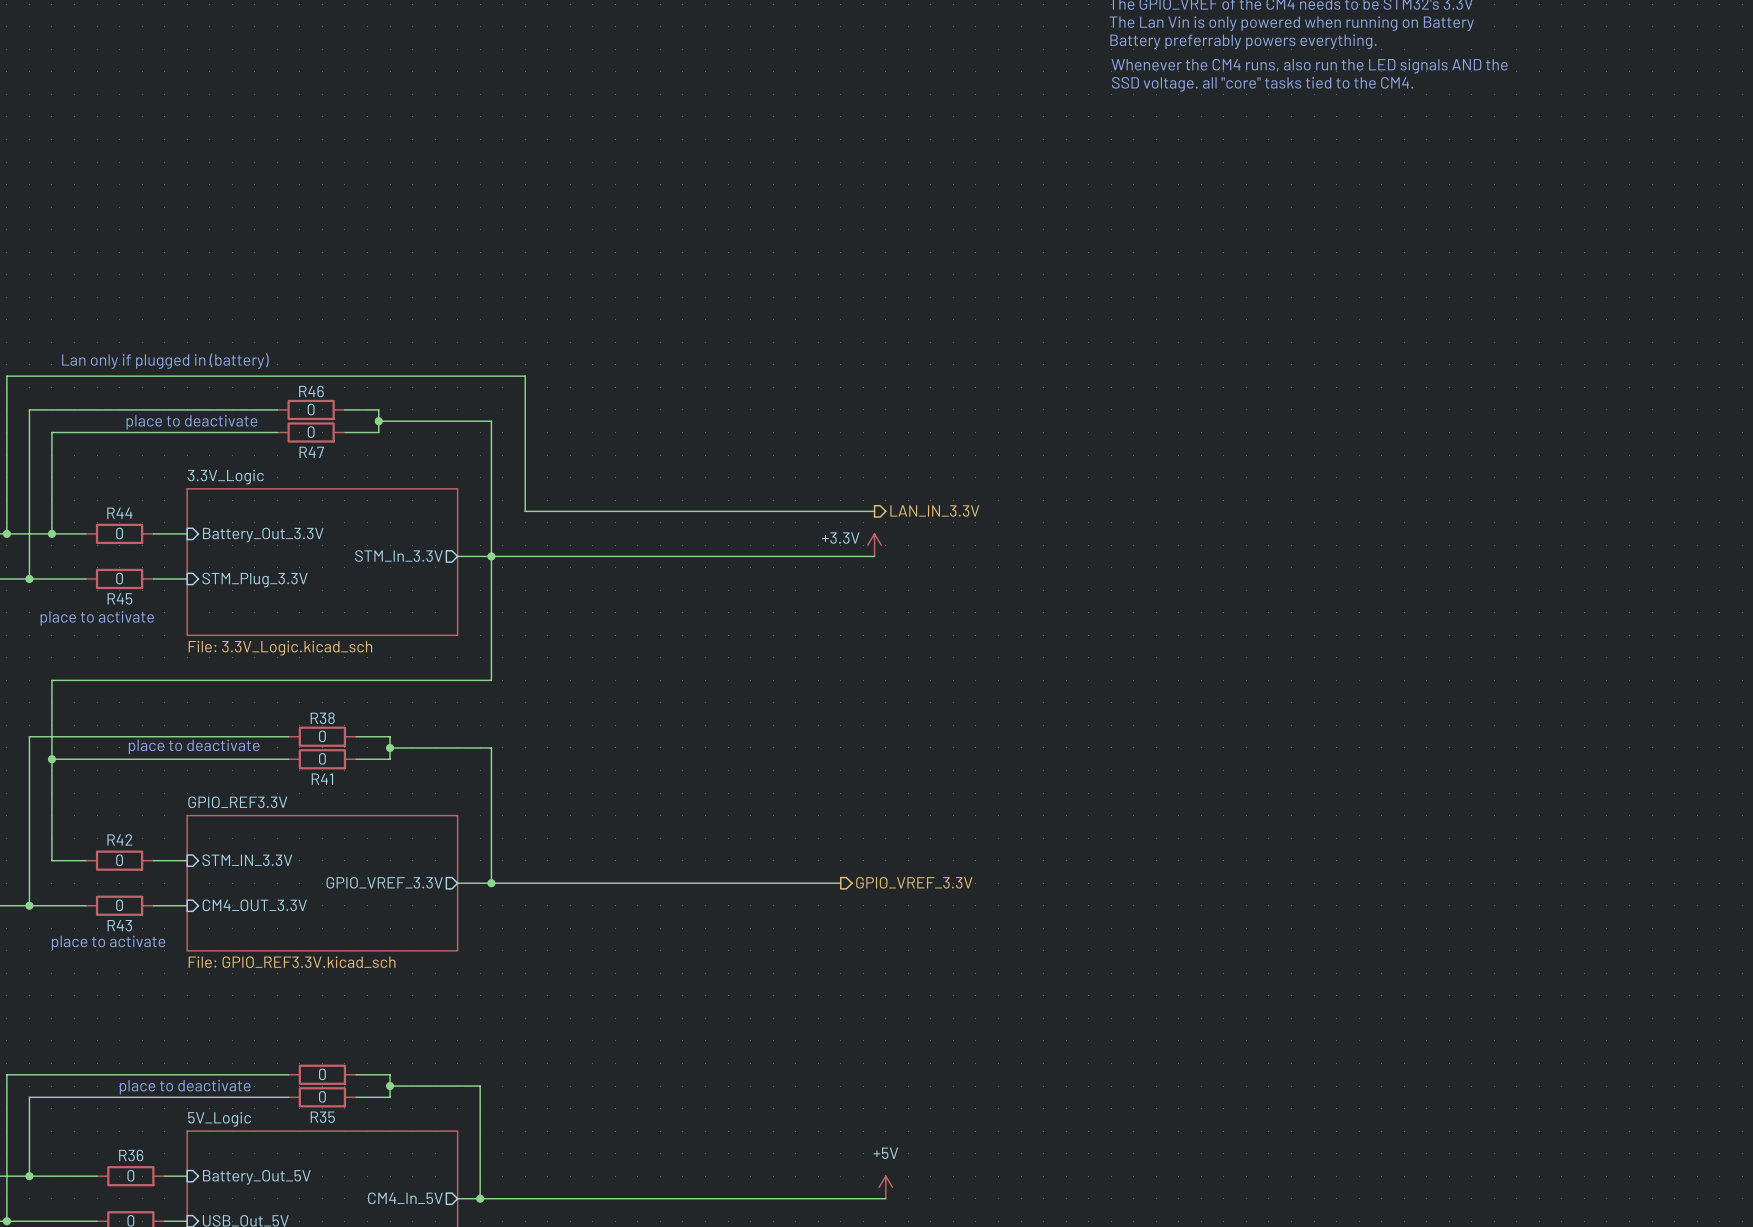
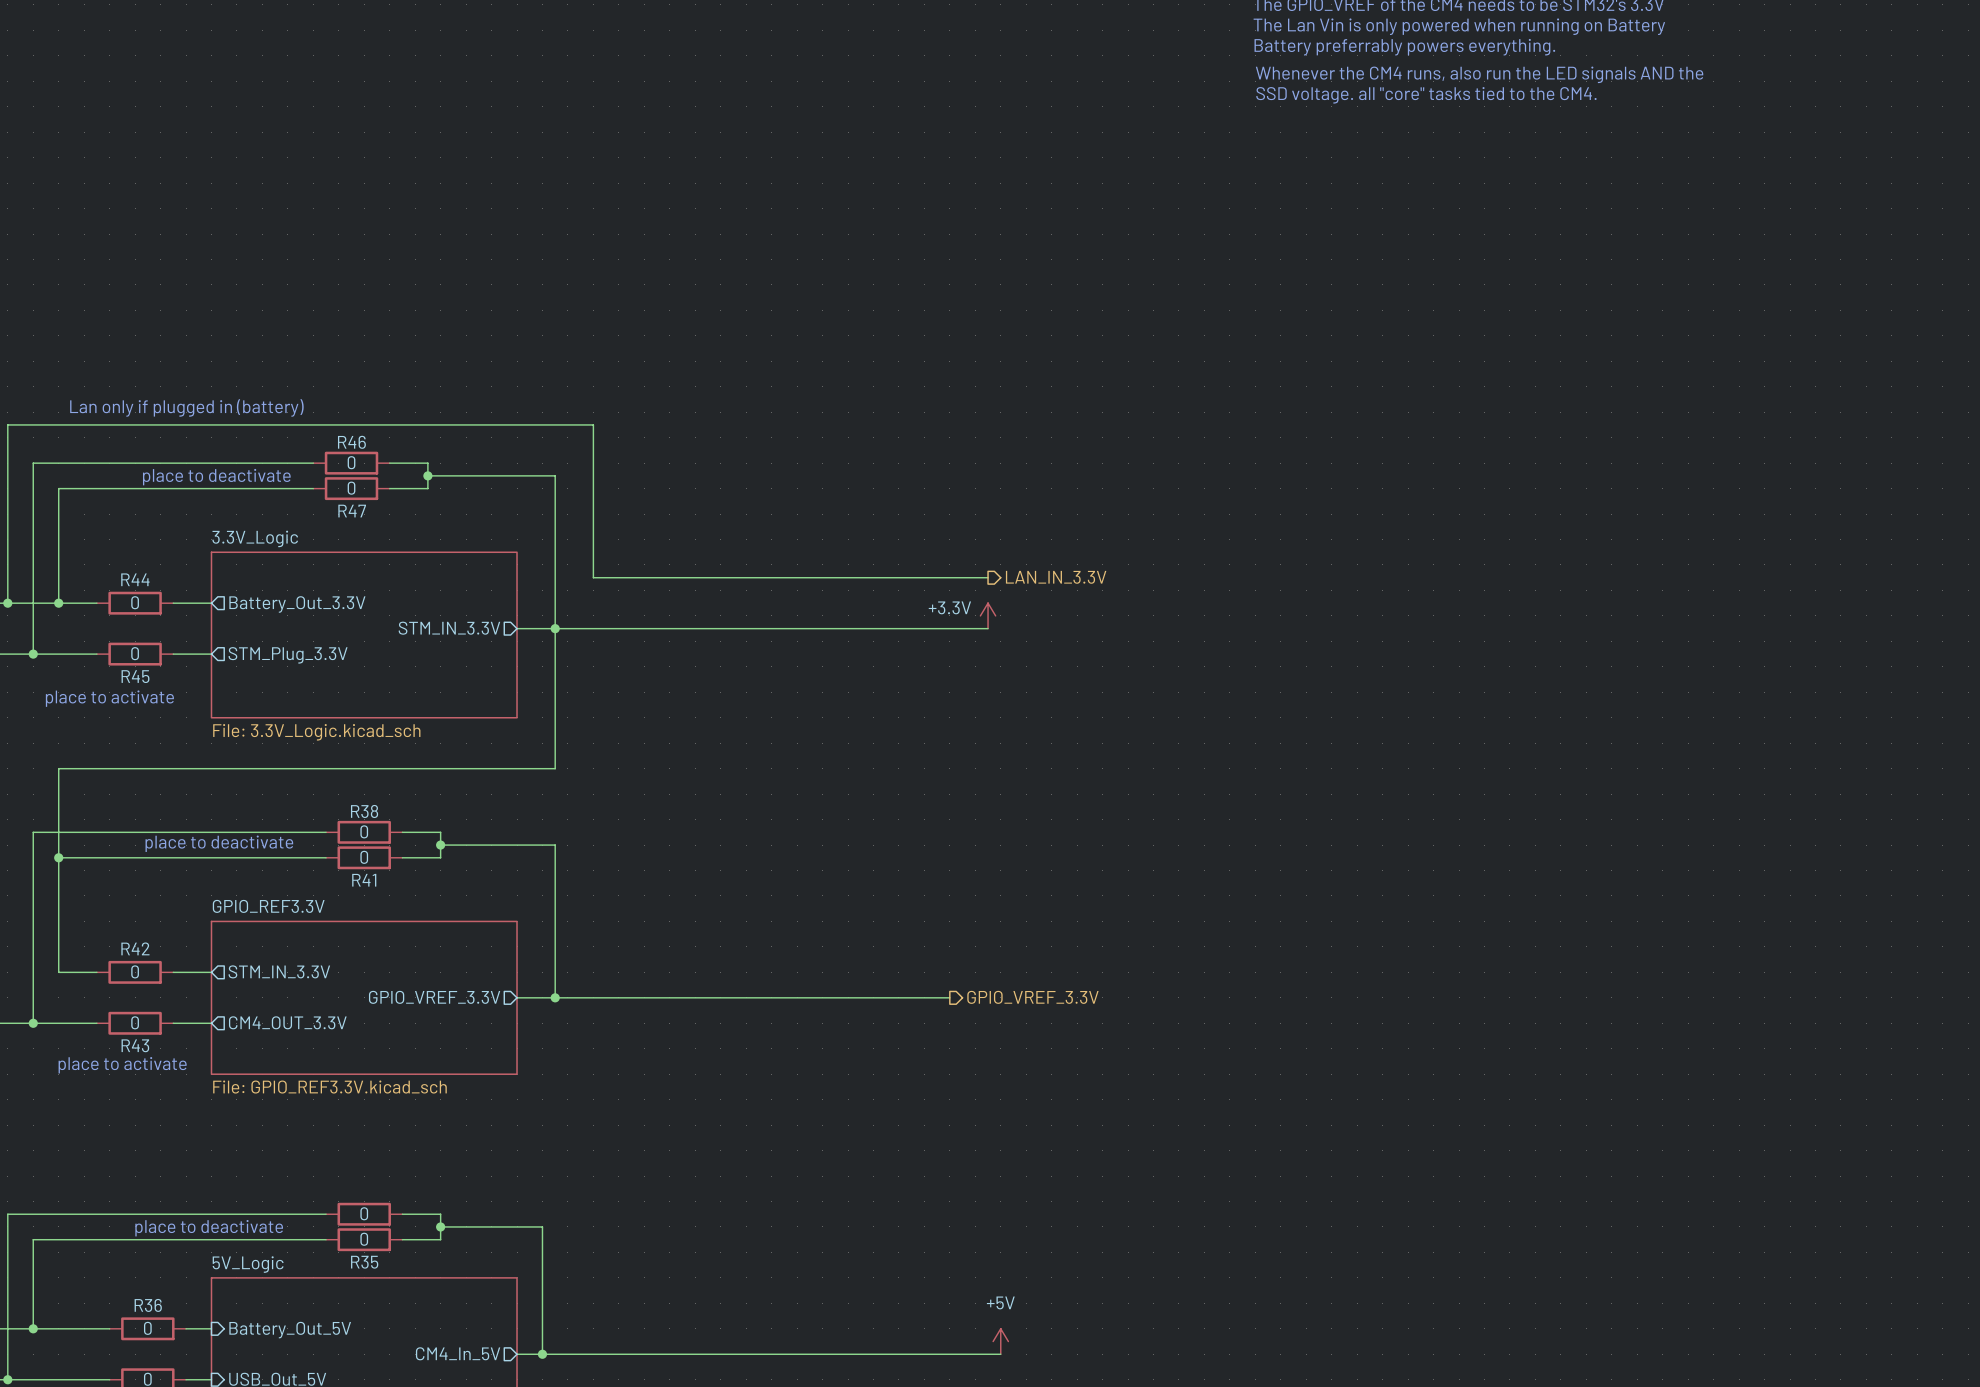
sheet pin shape: input (263, 535) -> output (297, 604)
sheet pin: STM_In_3.3V (398, 556) -> STM_IN_3.3V (449, 628)
sheet pin shape: input (254, 580) -> output (288, 655)
sheet pin shape: input (247, 860) -> output (279, 971)
sheet pin shape: input (254, 905) -> output (287, 1022)

